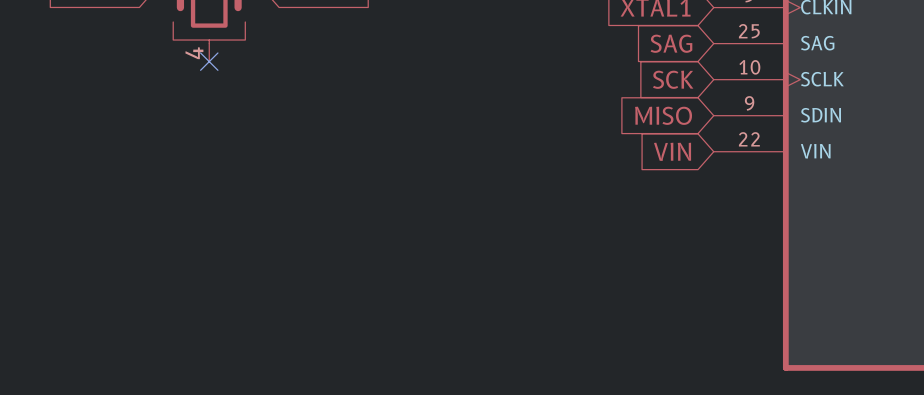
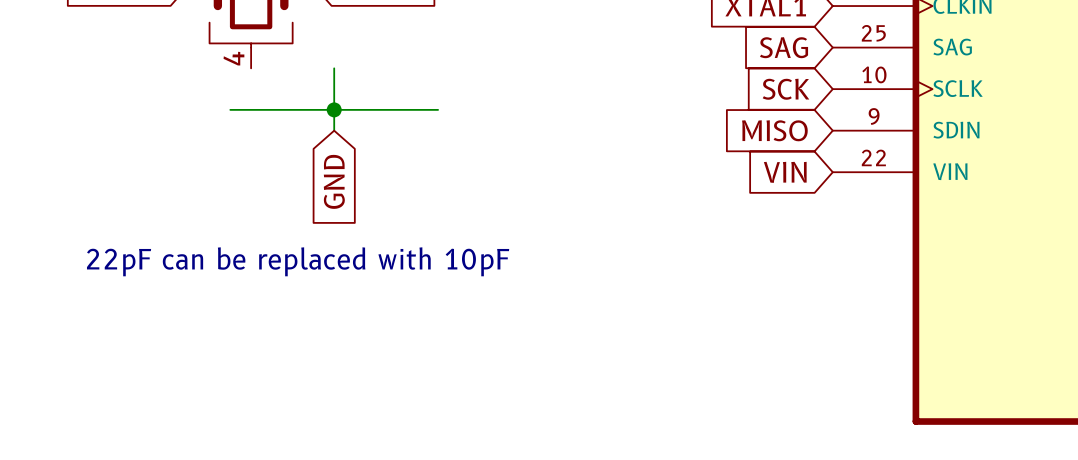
no-connect mark: (209, 61) -> none
wire: none -> (334, 68) (334, 130)
wire: none -> (230, 109) (438, 109)
junction: none -> (334, 109)
global label: none -> GND (334, 181)
text: none -> 22pF can be replaced with 10pF (298, 261)

